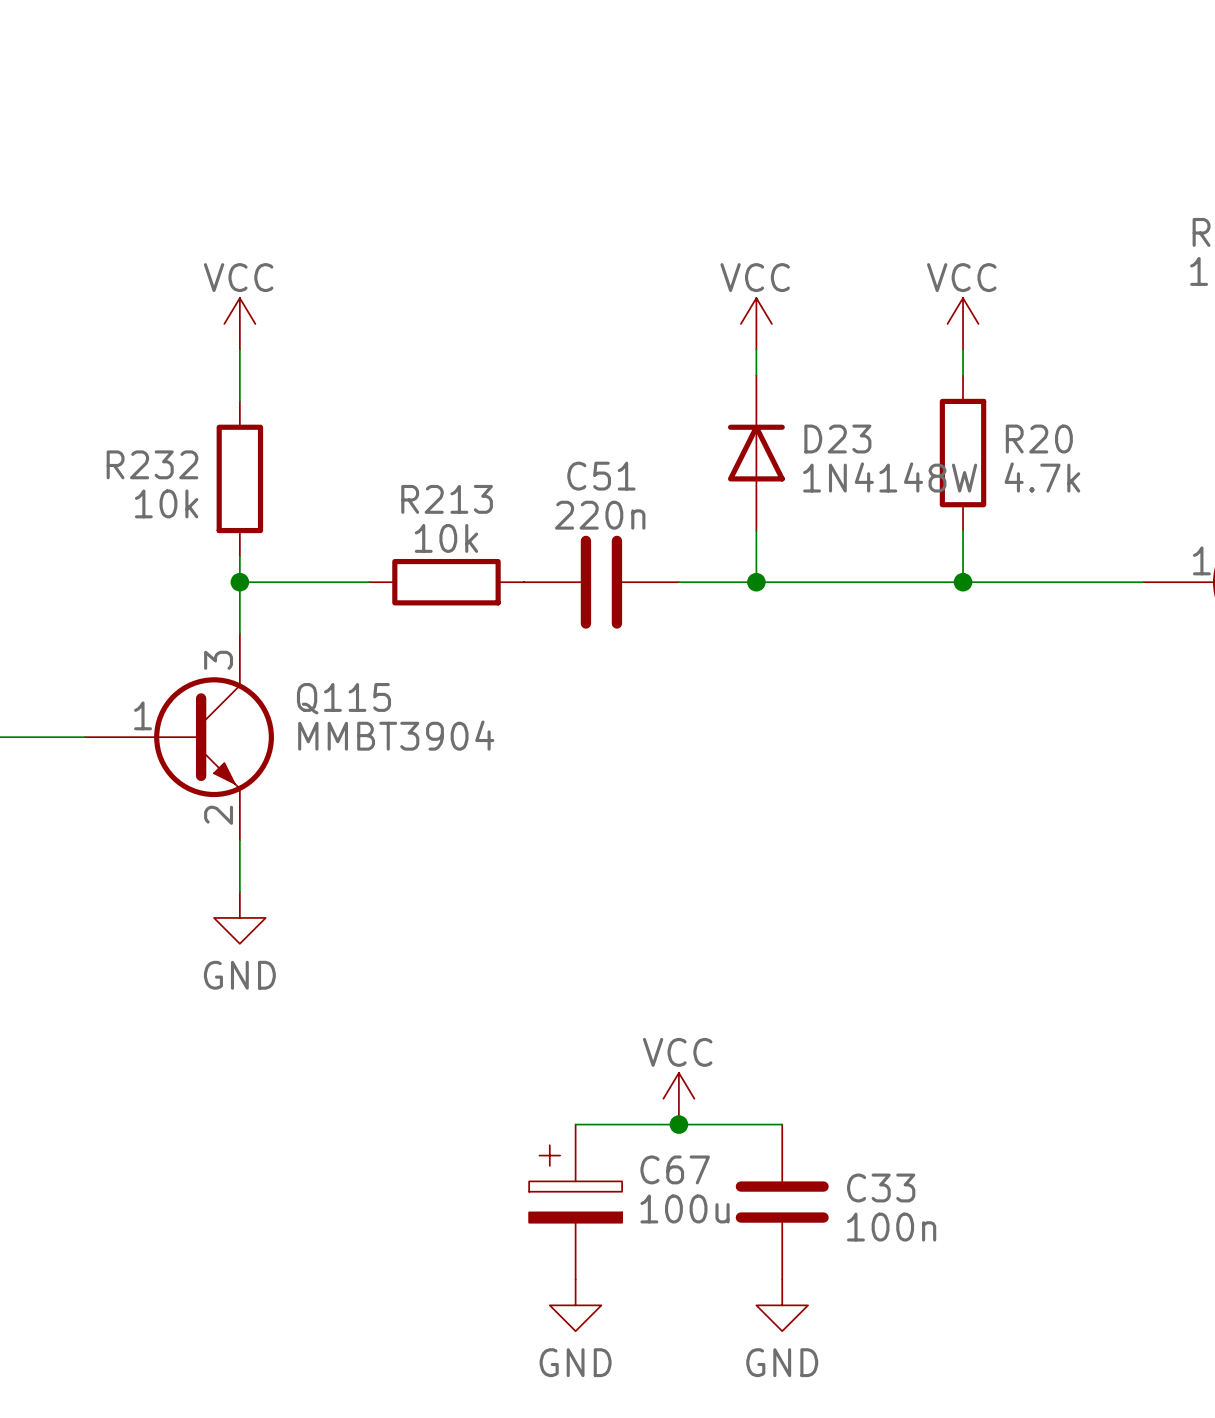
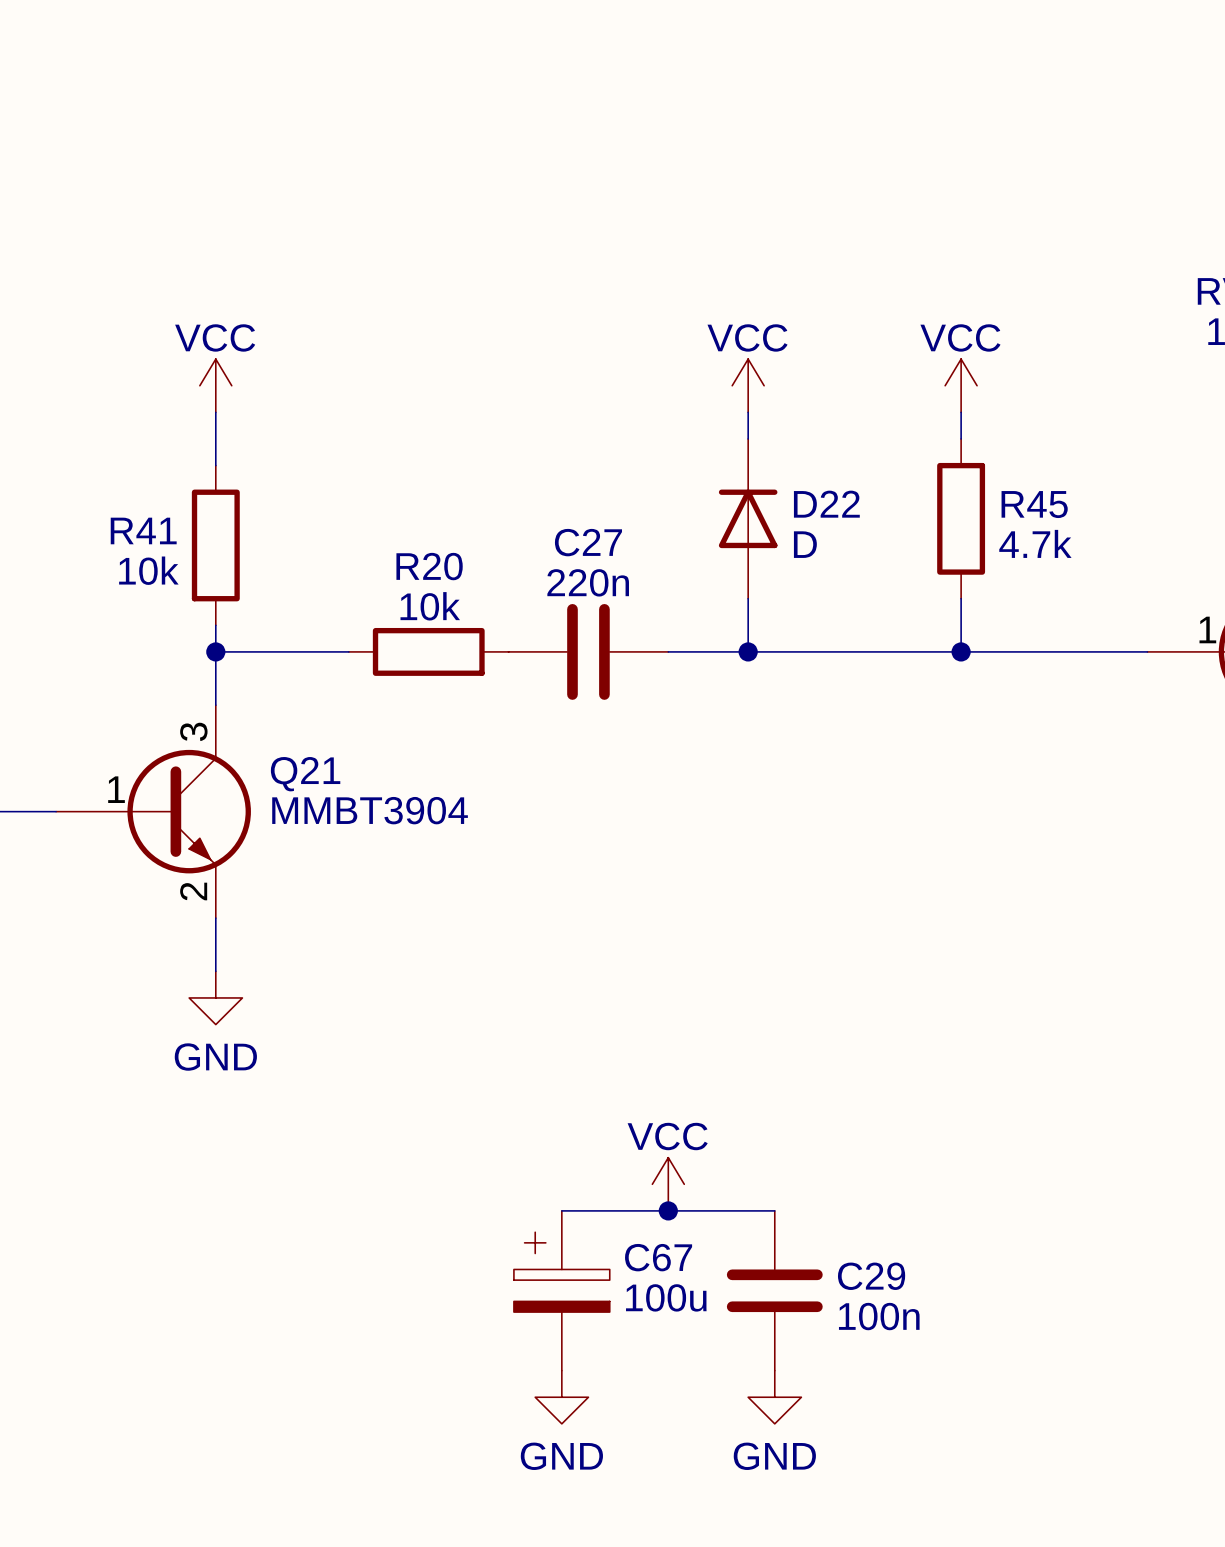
D23 name: D23 (837, 439) -> D22 (826, 504)
R20 name: R20 (1039, 439) -> R45 (1034, 504)
R232 name: R232 (152, 464) -> R41 (143, 530)
C51 name: C51 (601, 476) -> C27 (588, 542)
D23 value: 1N4148W (890, 477) -> D (805, 544)
R213 name: R213 (447, 499) -> R20 (429, 566)
Q115 name: Q115 (343, 698) -> Q21 (305, 774)
C33 name: C33 (881, 1187) -> C29 (871, 1276)

